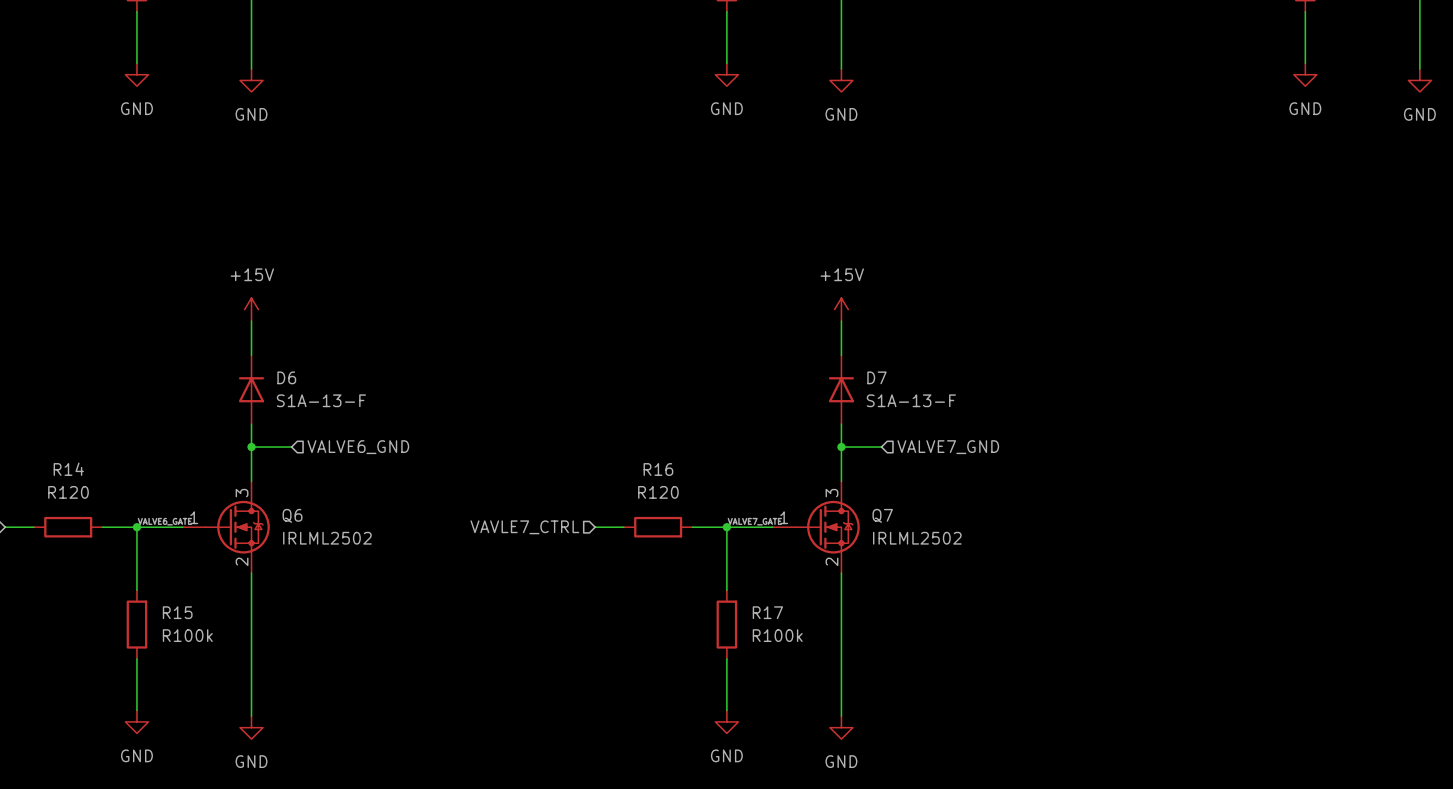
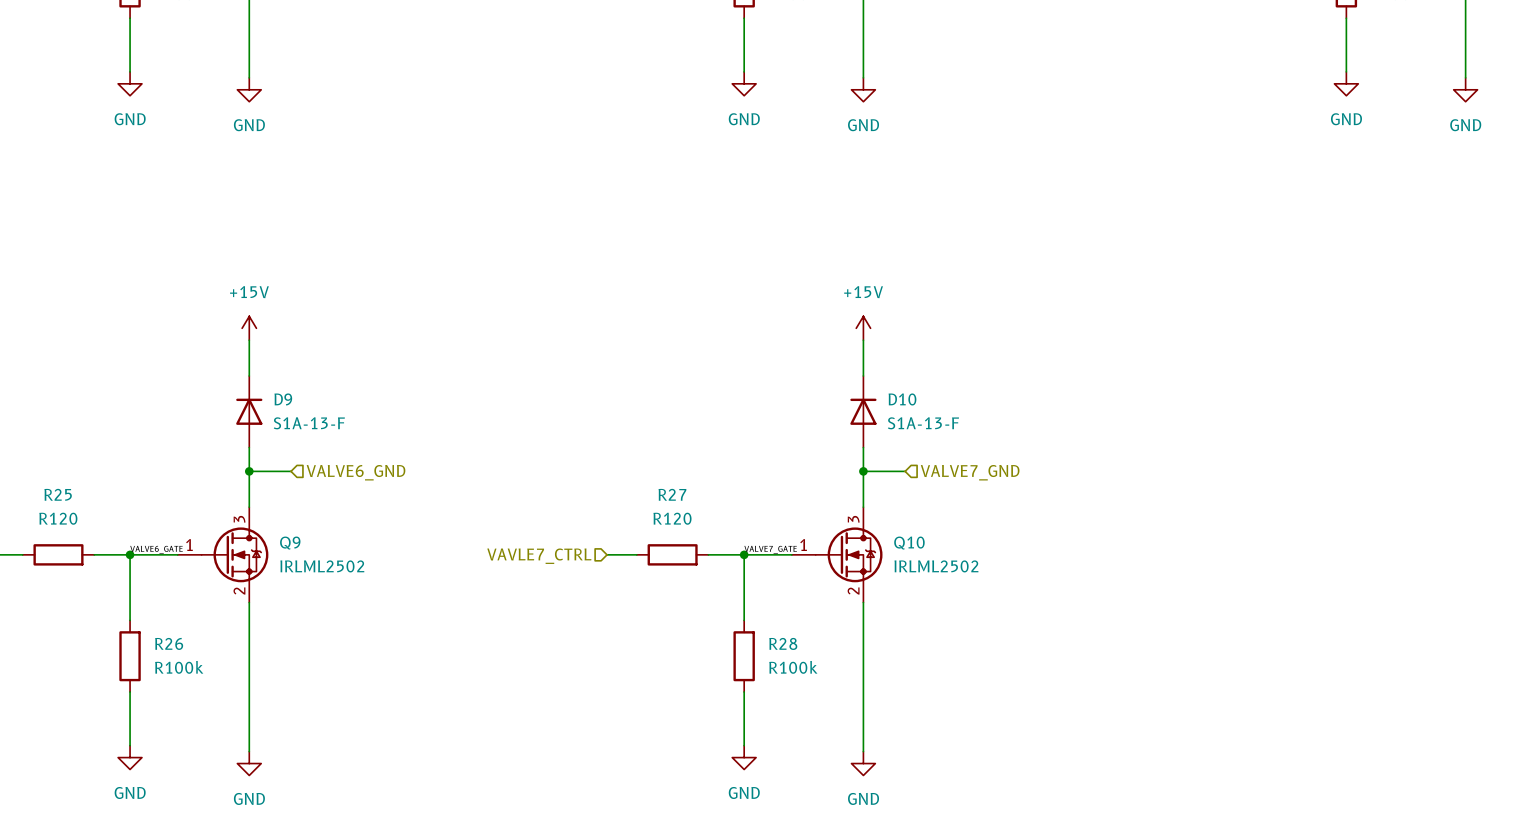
D6 name: D6 (286, 377) -> D9 (283, 399)
D7 name: D7 (876, 377) -> D10 (902, 399)
R14 name: R14 (68, 469) -> R25 (58, 494)
R16 name: R16 (658, 469) -> R27 (672, 494)
Q6 name: Q6 (292, 515) -> Q9 (290, 543)
Q7 name: Q7 (882, 515) -> Q10 (909, 543)
R15 name: R15 (177, 612) -> R26 (169, 643)
R17 name: R17 (767, 612) -> R28 (783, 643)

